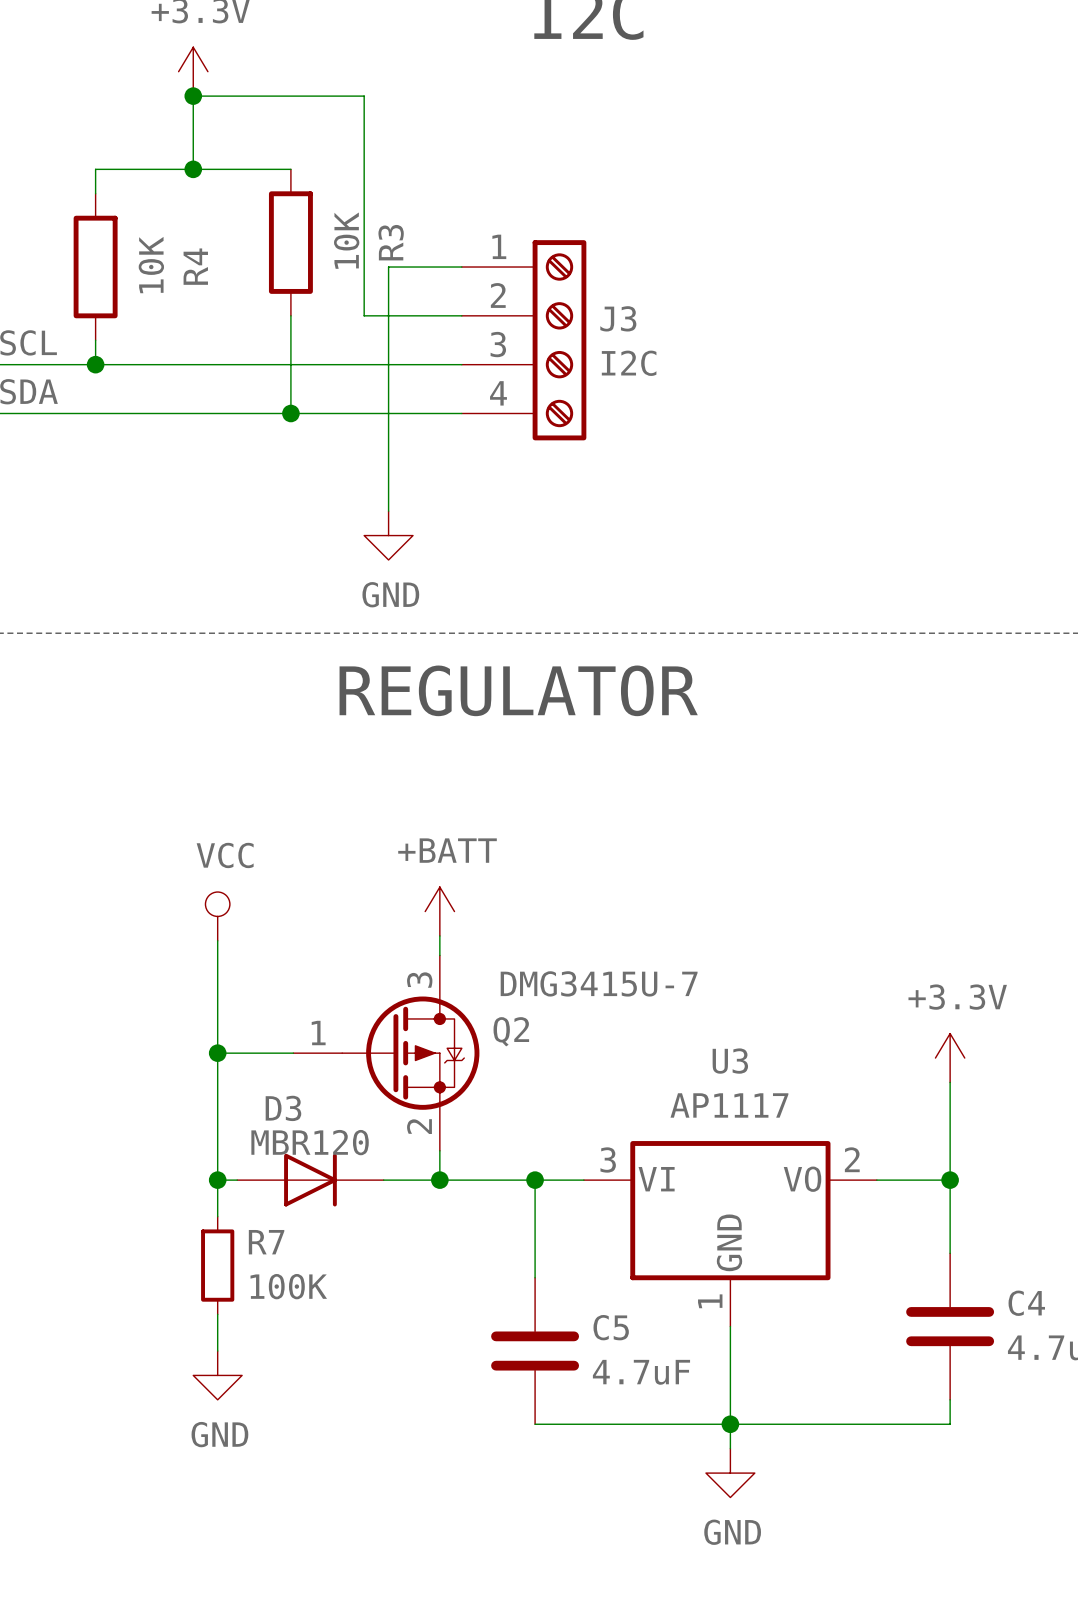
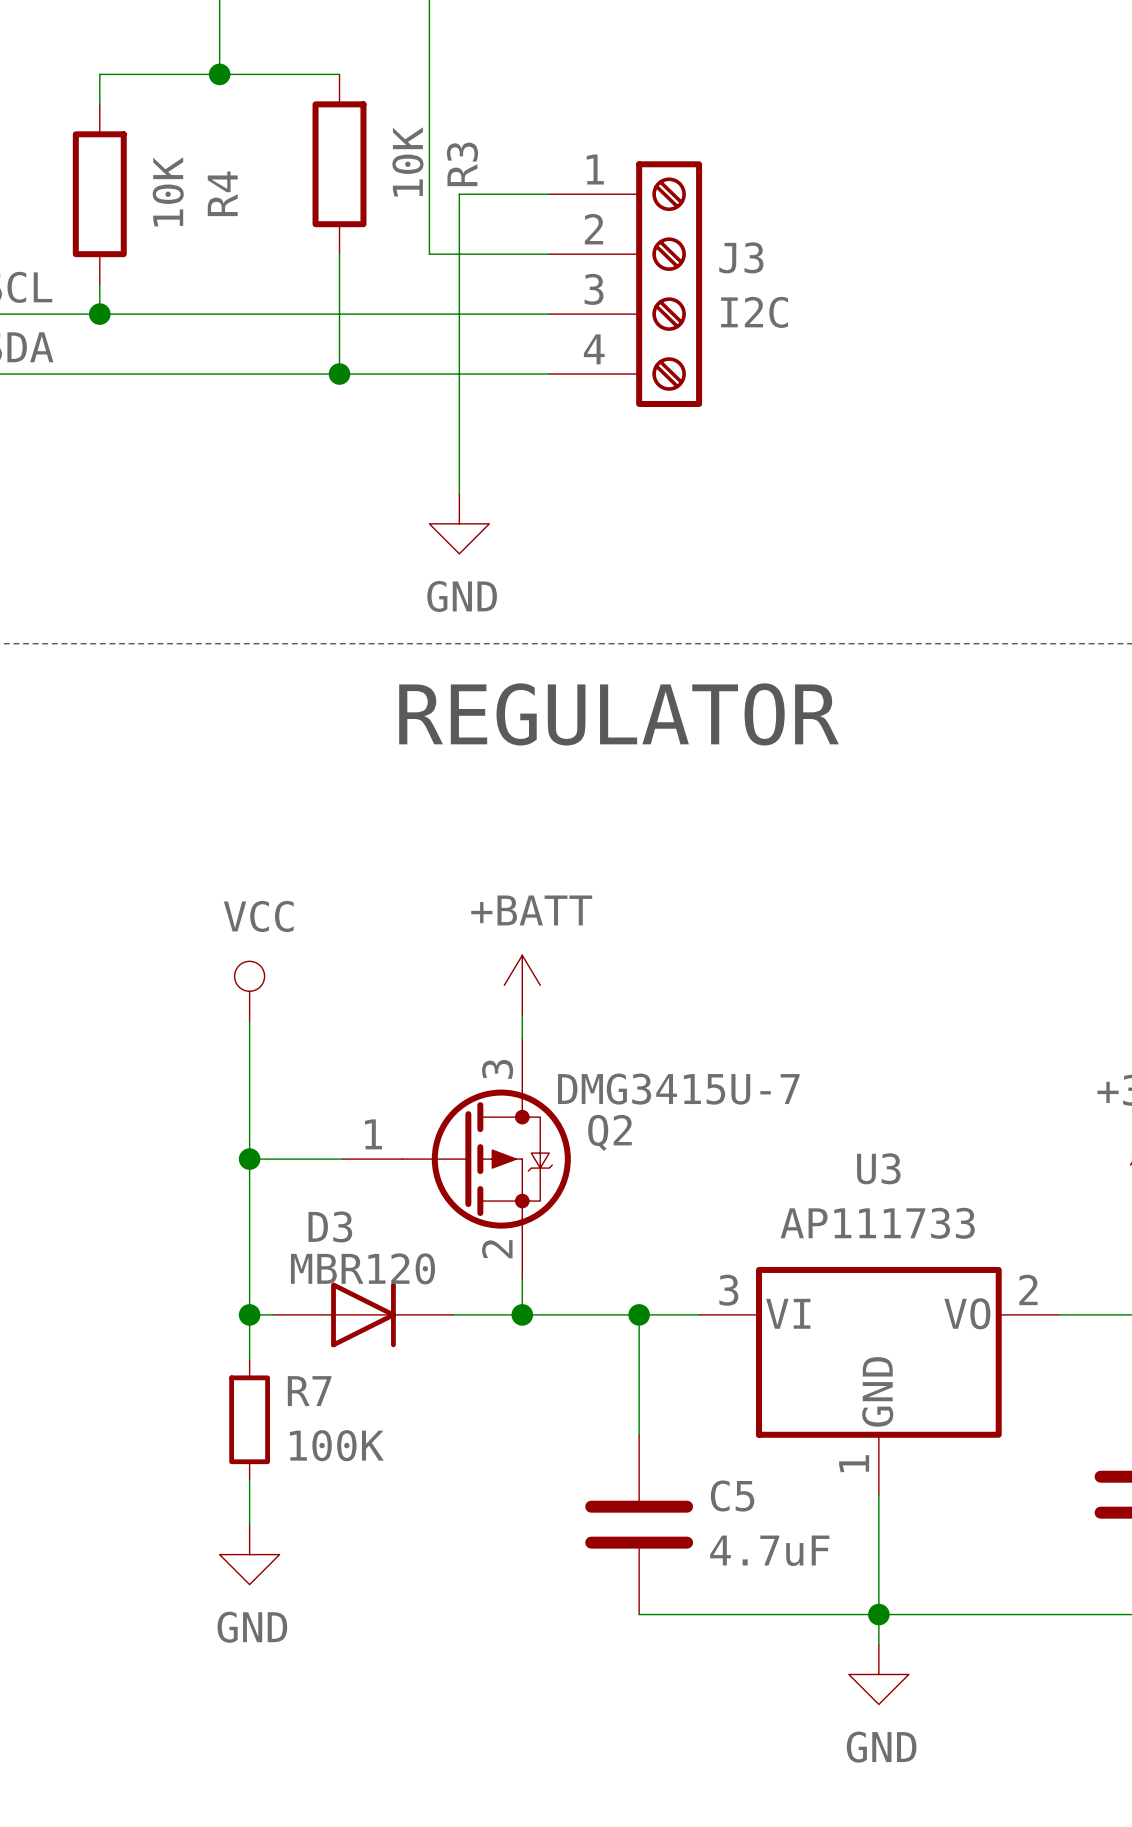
Q2 value position: DMG3415U-7 (599, 983) -> DMG3415U-7 (678, 1089)
U3 value: AP1117 (729, 1105) -> AP111733 (877, 1223)

